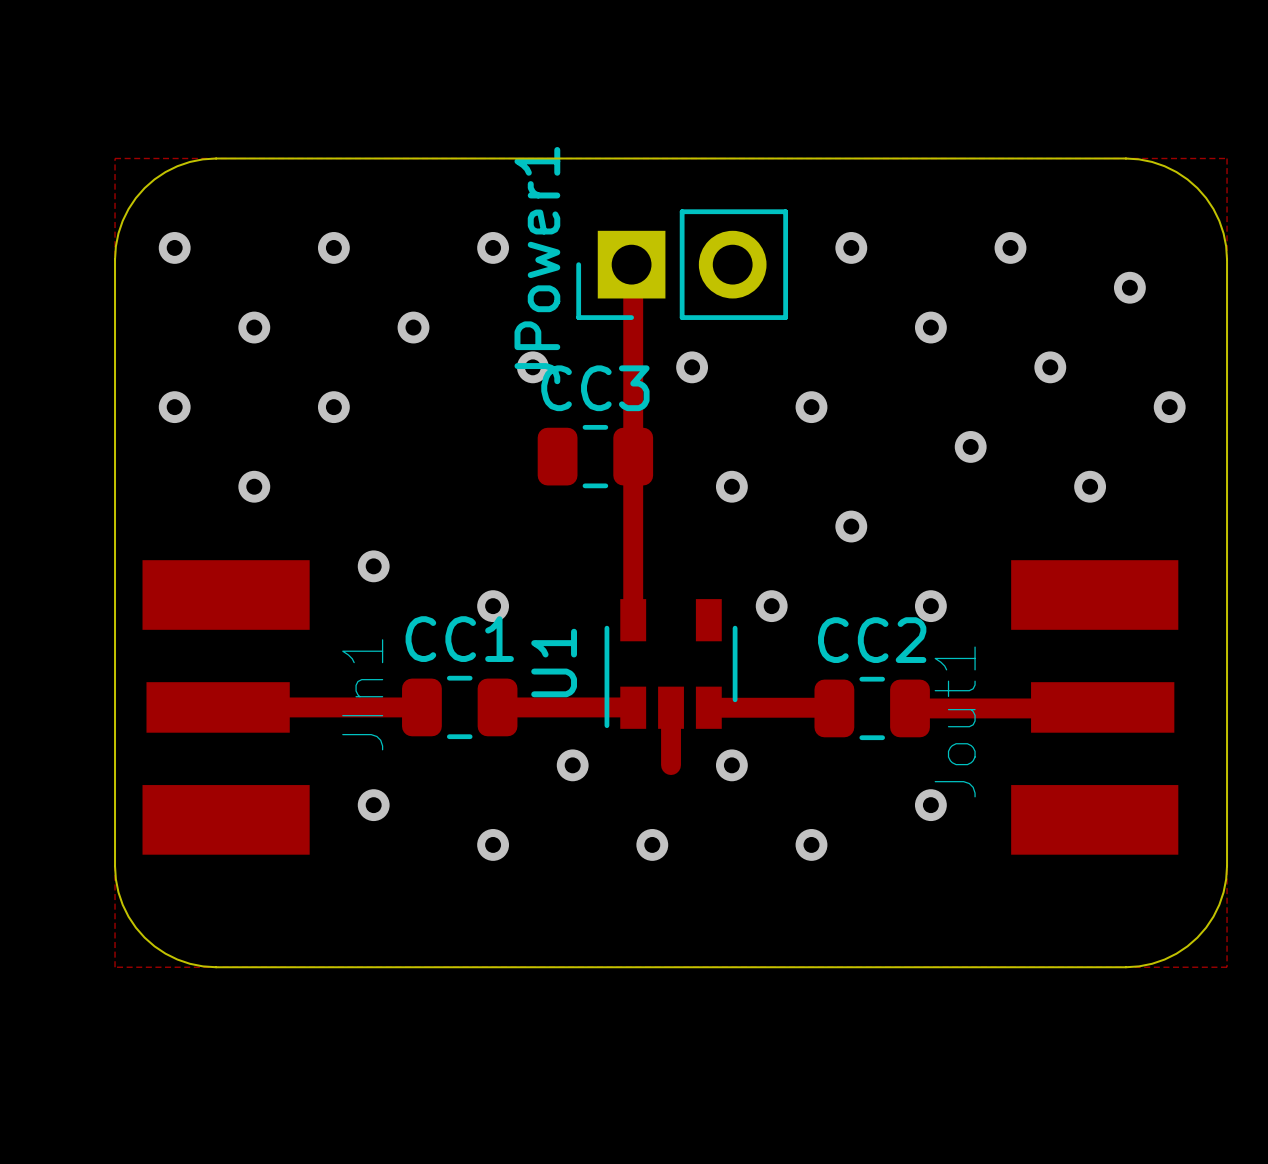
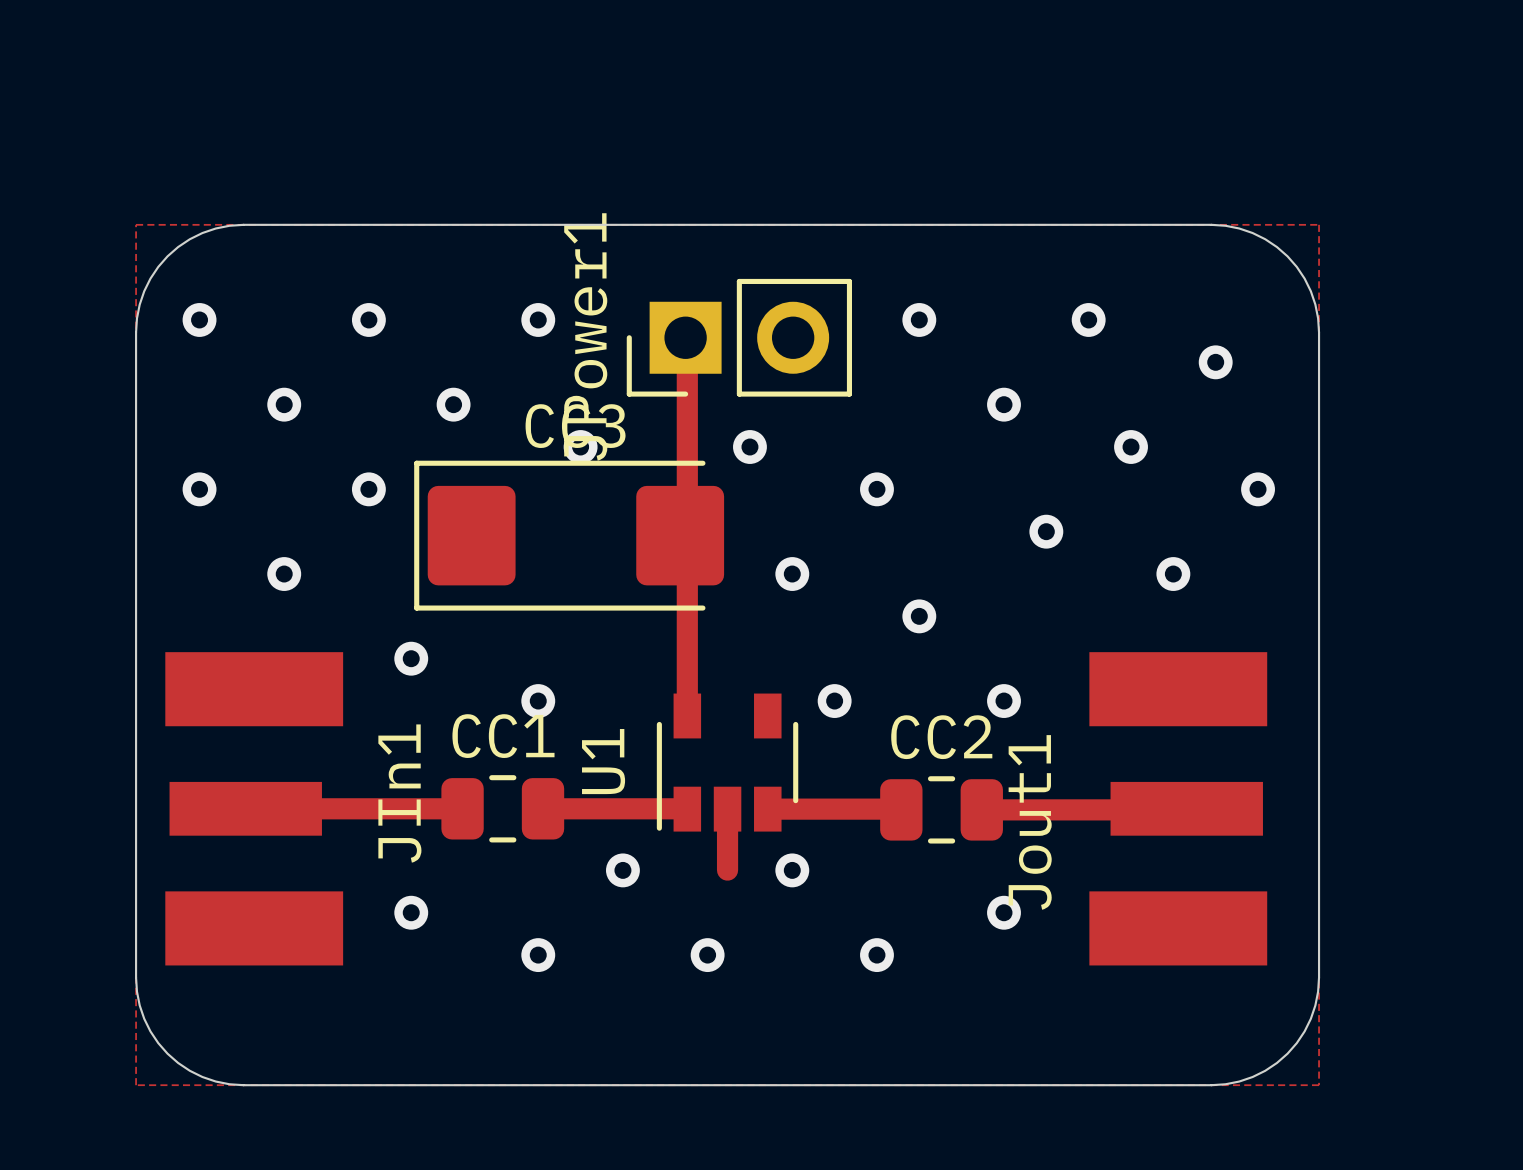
CC3 footprint: [537, 424, 654, 489] -> [414, 460, 725, 611]

